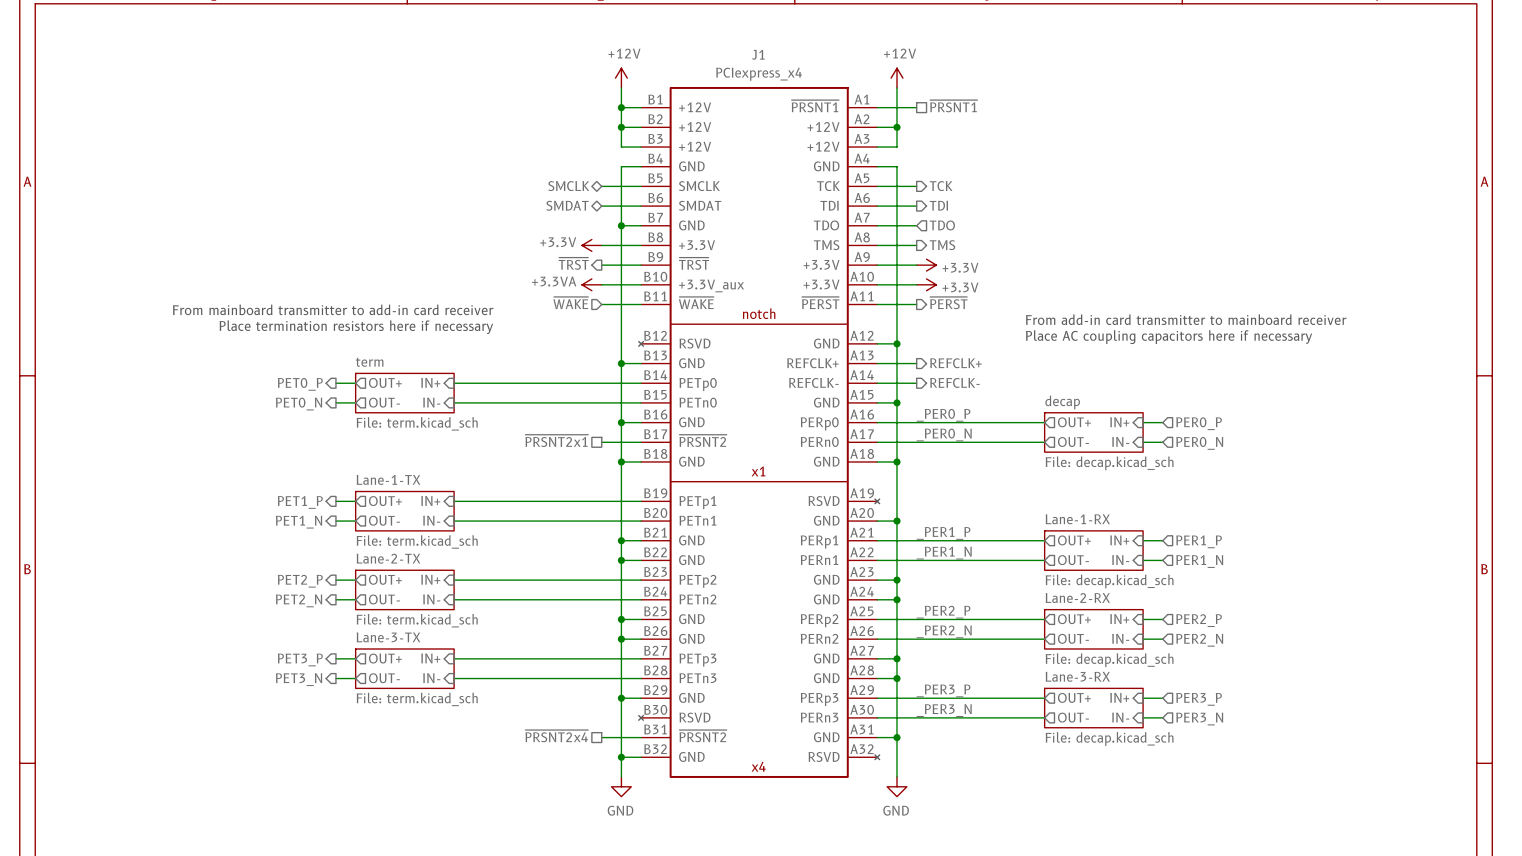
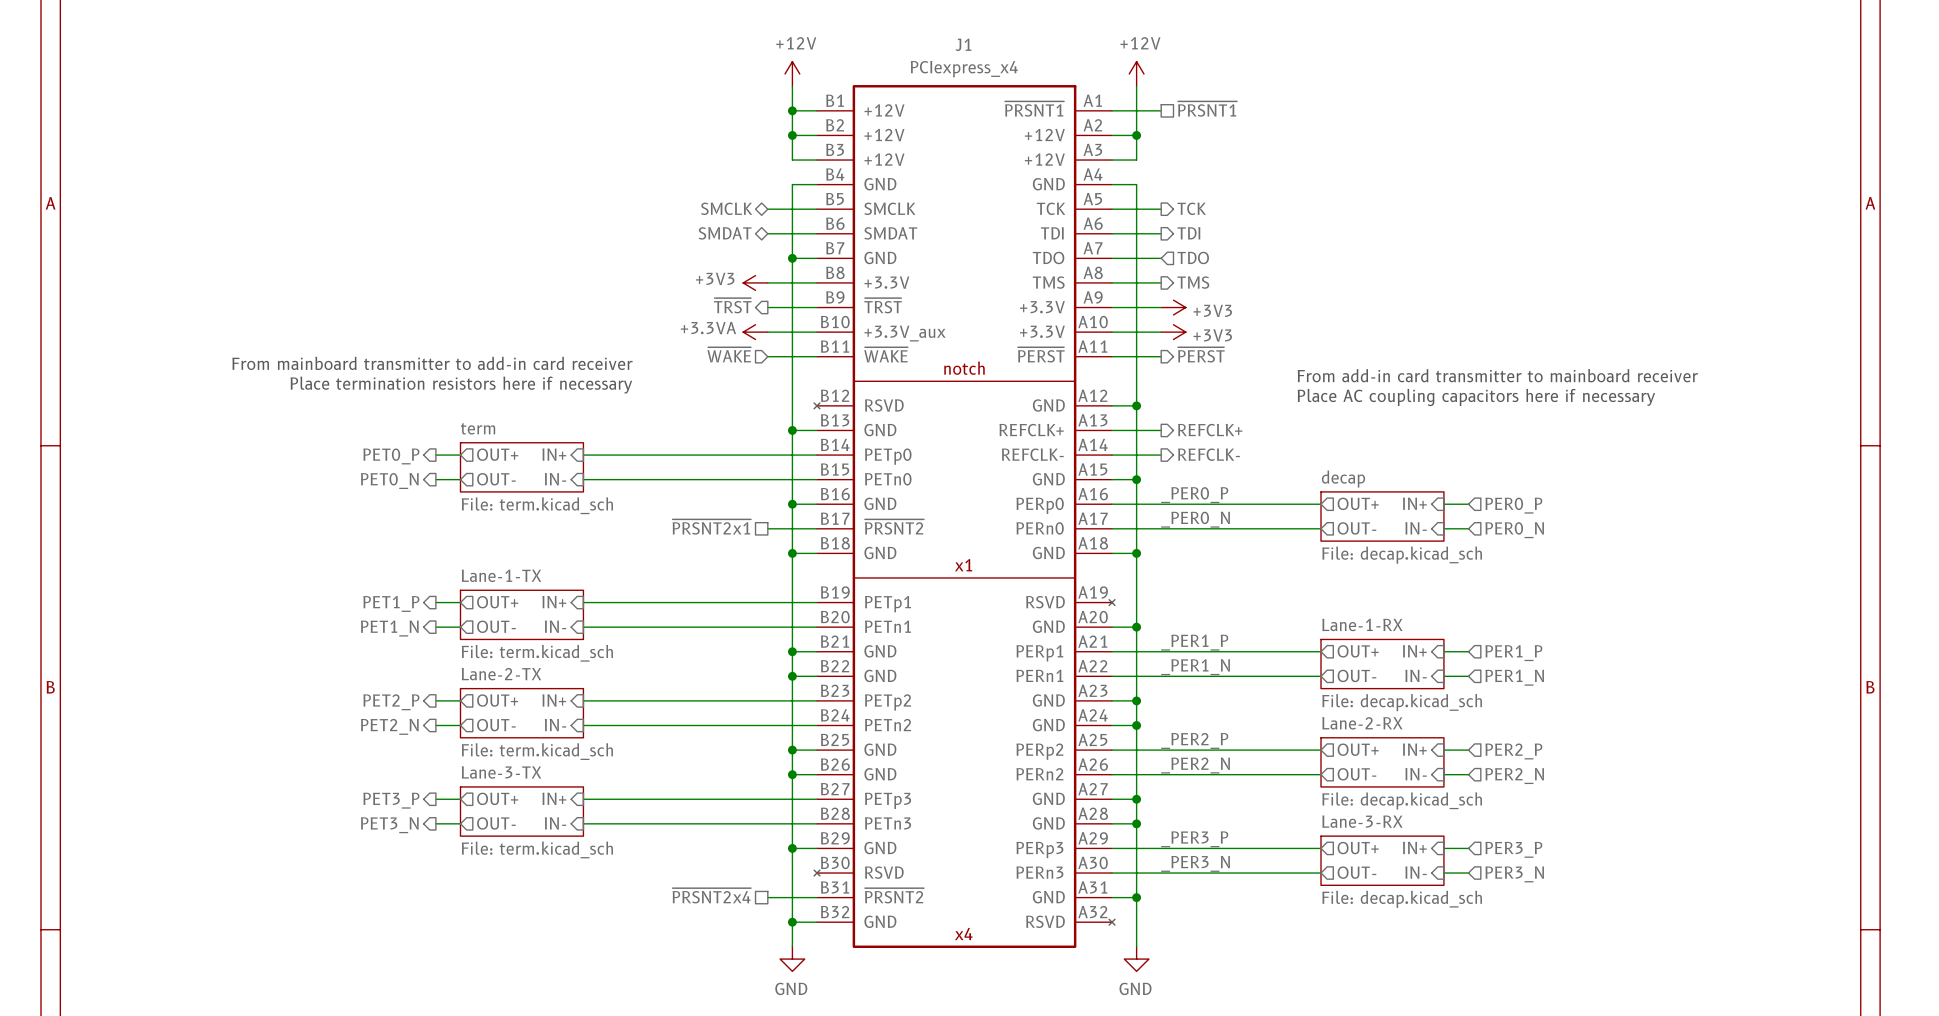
power symbol: +3.3V (591, 245) -> +3V3 (755, 282)
power symbol: +3.3V (926, 265) -> +3V3 (1173, 307)
power symbol: +3.3V (926, 284) -> +3V3 (1173, 332)

